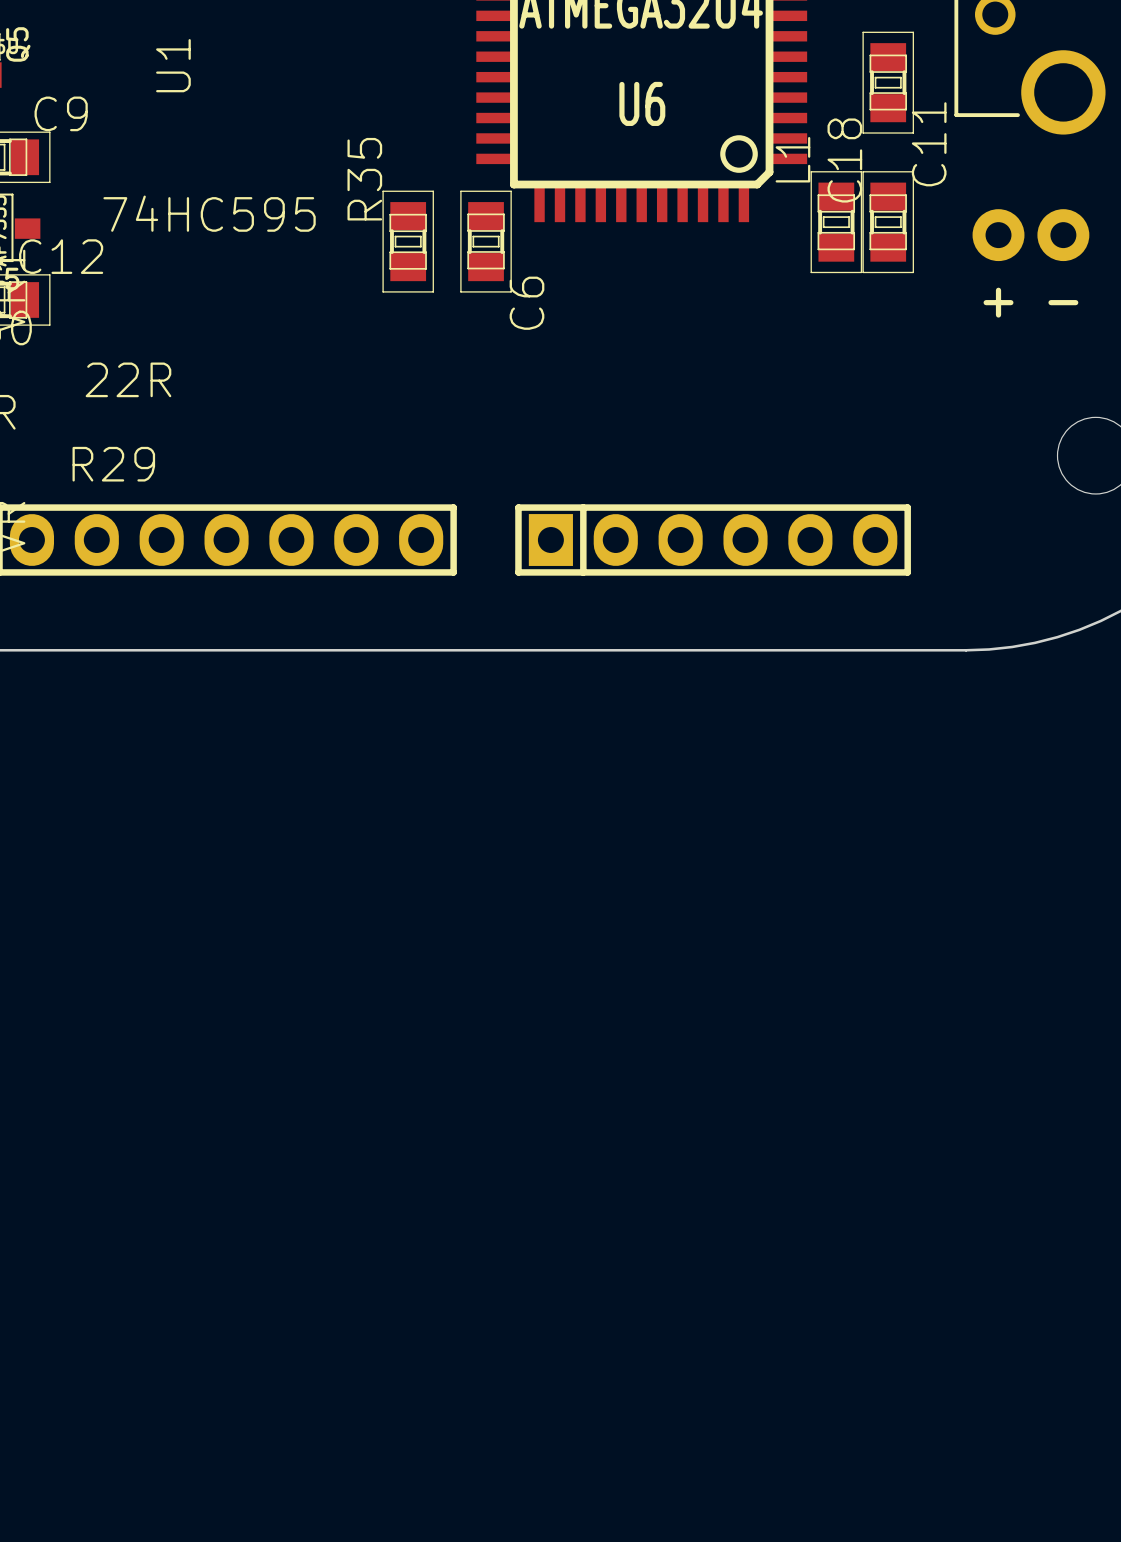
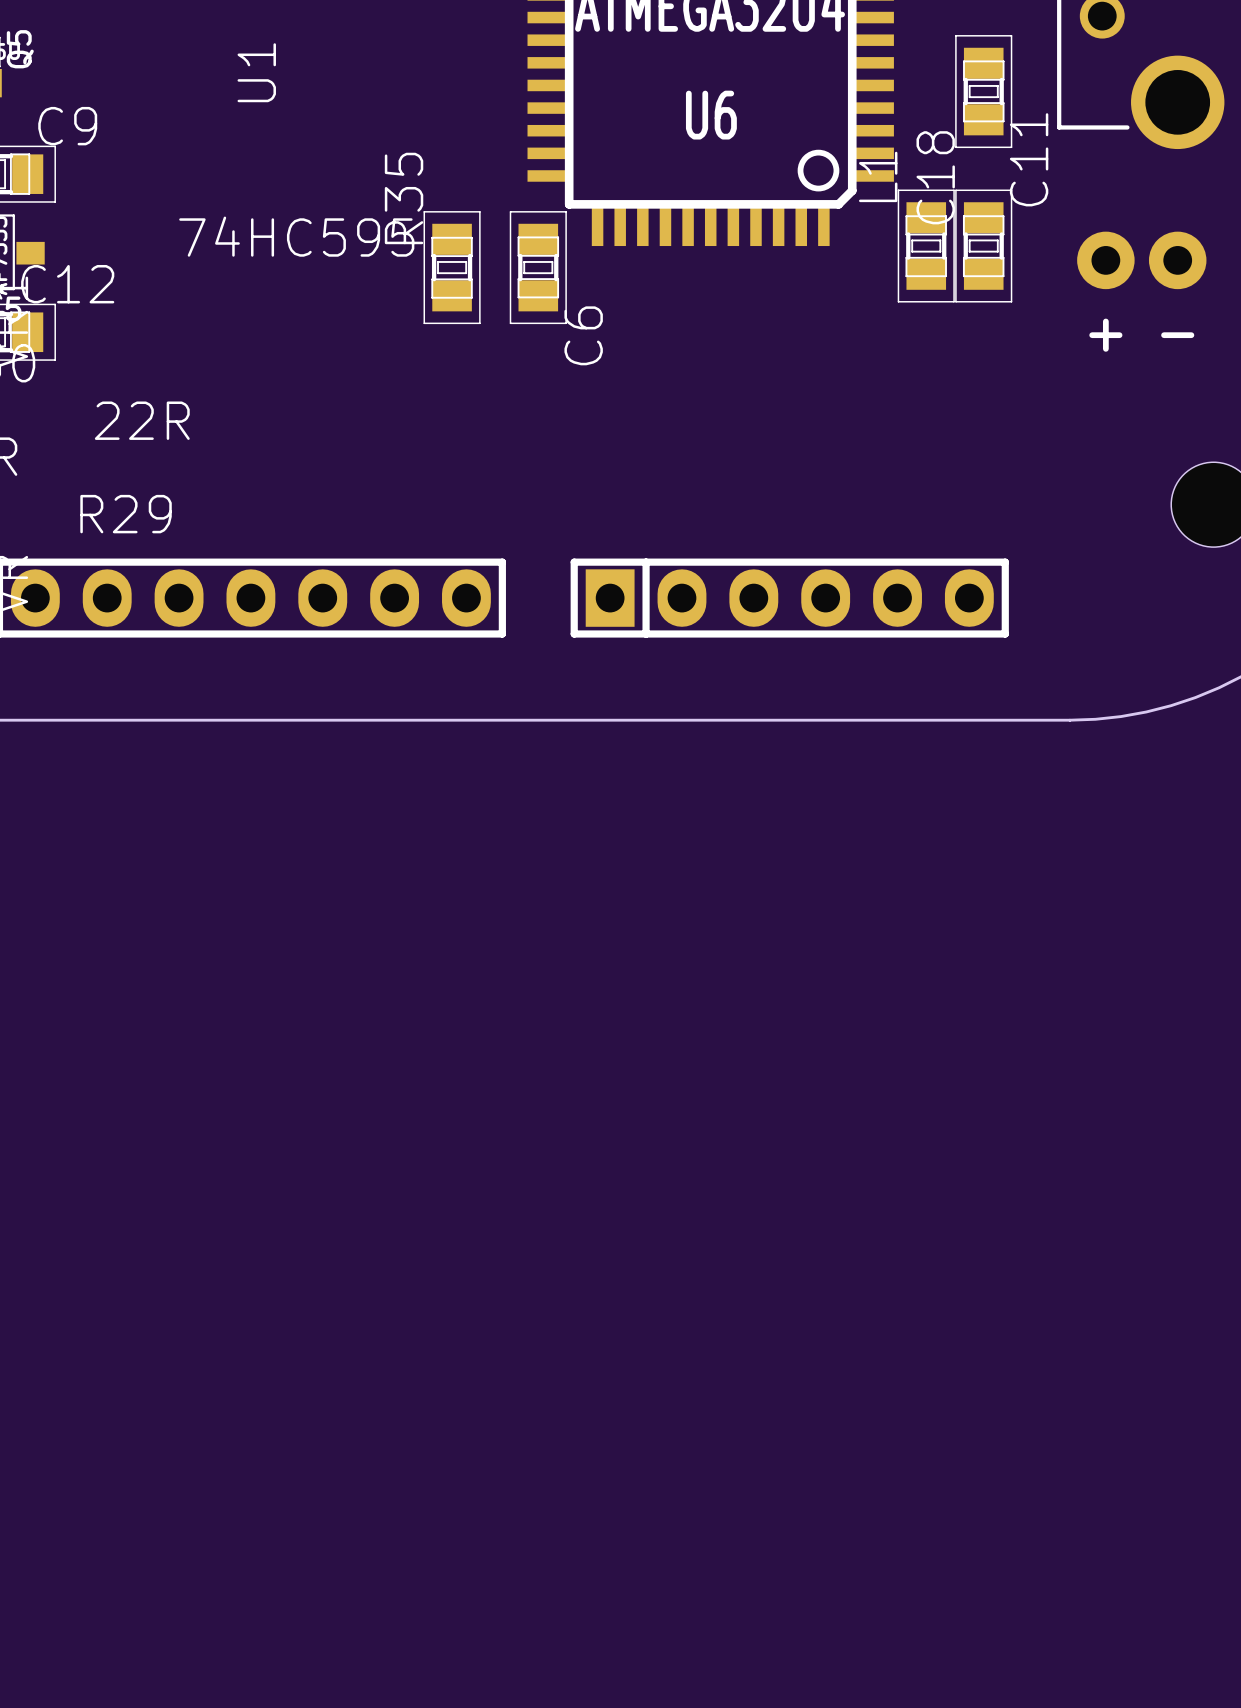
U1 position: (209, 135) -> (296, 149)

